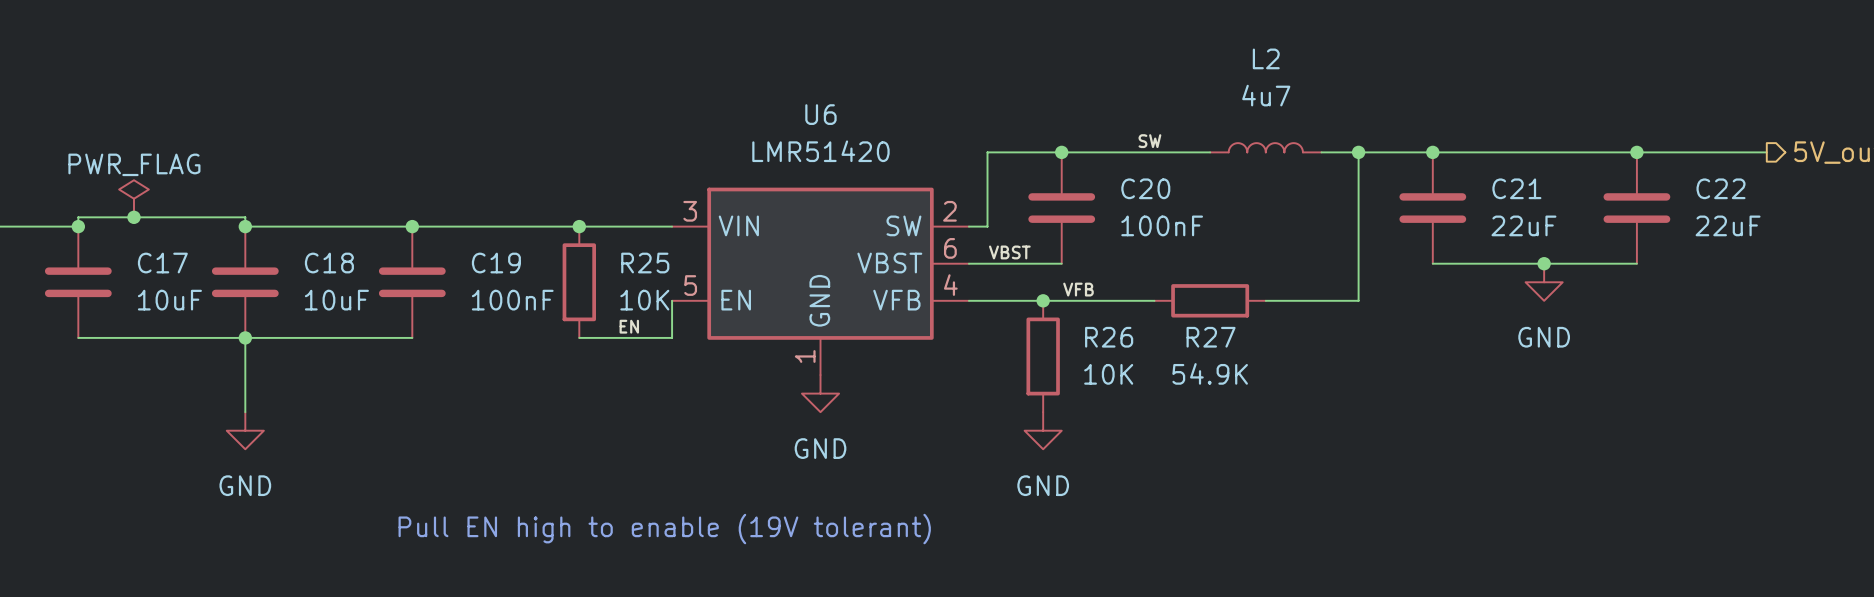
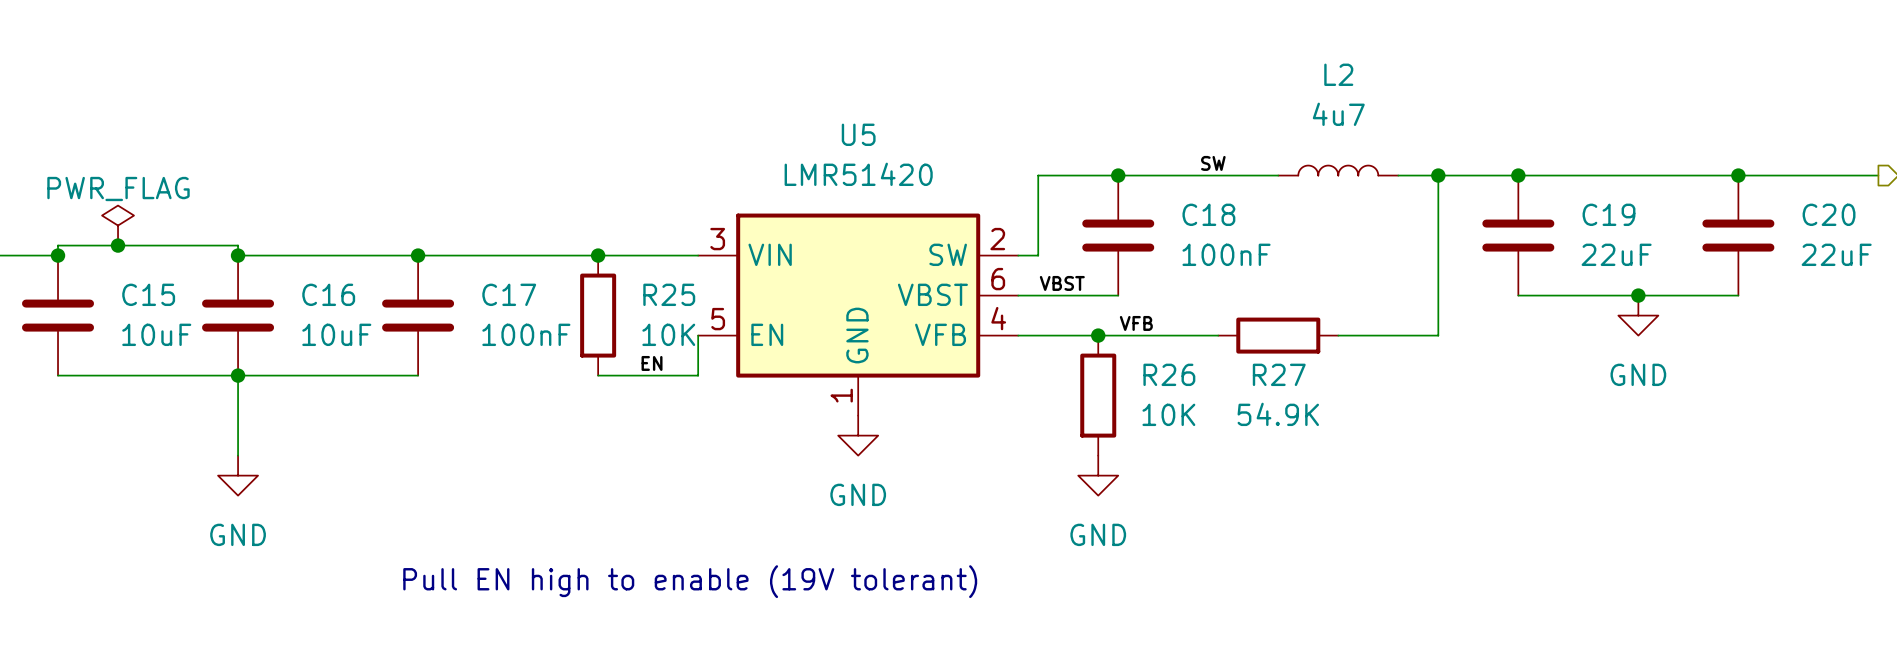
U6 name: U6 (820, 114) -> U5 (858, 134)
C20 name: C20 (1145, 188) -> C18 (1208, 214)
C21 name: C21 (1516, 188) -> C19 (1608, 214)
C22 name: C22 (1720, 188) -> C20 (1829, 214)
C17 name: C17 (162, 263) -> C15 (148, 294)
C18 name: C18 (329, 263) -> C16 (328, 294)
C19 name: C19 (496, 263) -> C17 (509, 294)

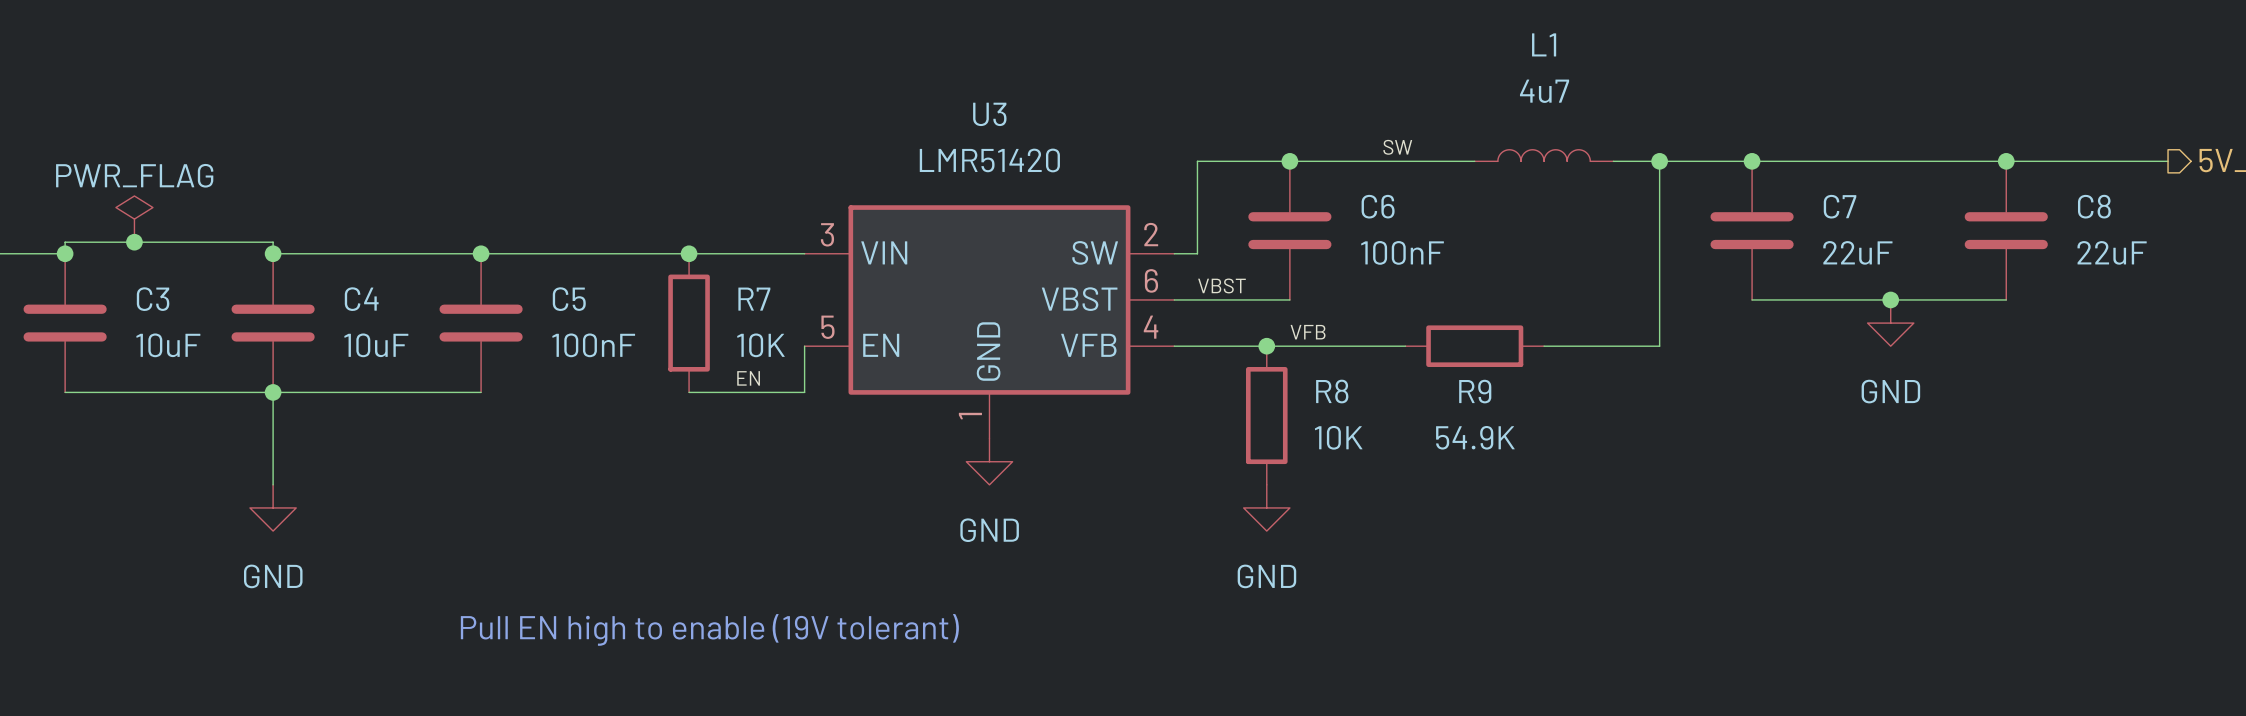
L2 name: L2 (1338, 74) -> L1 (1544, 44)
U5 name: U5 (858, 134) -> U3 (989, 114)
C18 name: C18 (1208, 214) -> C6 (1378, 206)
C19 name: C19 (1608, 214) -> C7 (1840, 206)
C20 name: C20 (1829, 214) -> C8 (2094, 206)
C15 name: C15 (148, 294) -> C3 (153, 299)
C16 name: C16 (328, 294) -> C4 (361, 299)
C17 name: C17 (509, 294) -> C5 (569, 299)
R25 name: R25 (669, 294) -> R7 (754, 299)
R26 name: R26 (1169, 374) -> R8 (1332, 391)
R27 name: R27 (1279, 374) -> R9 (1475, 391)

